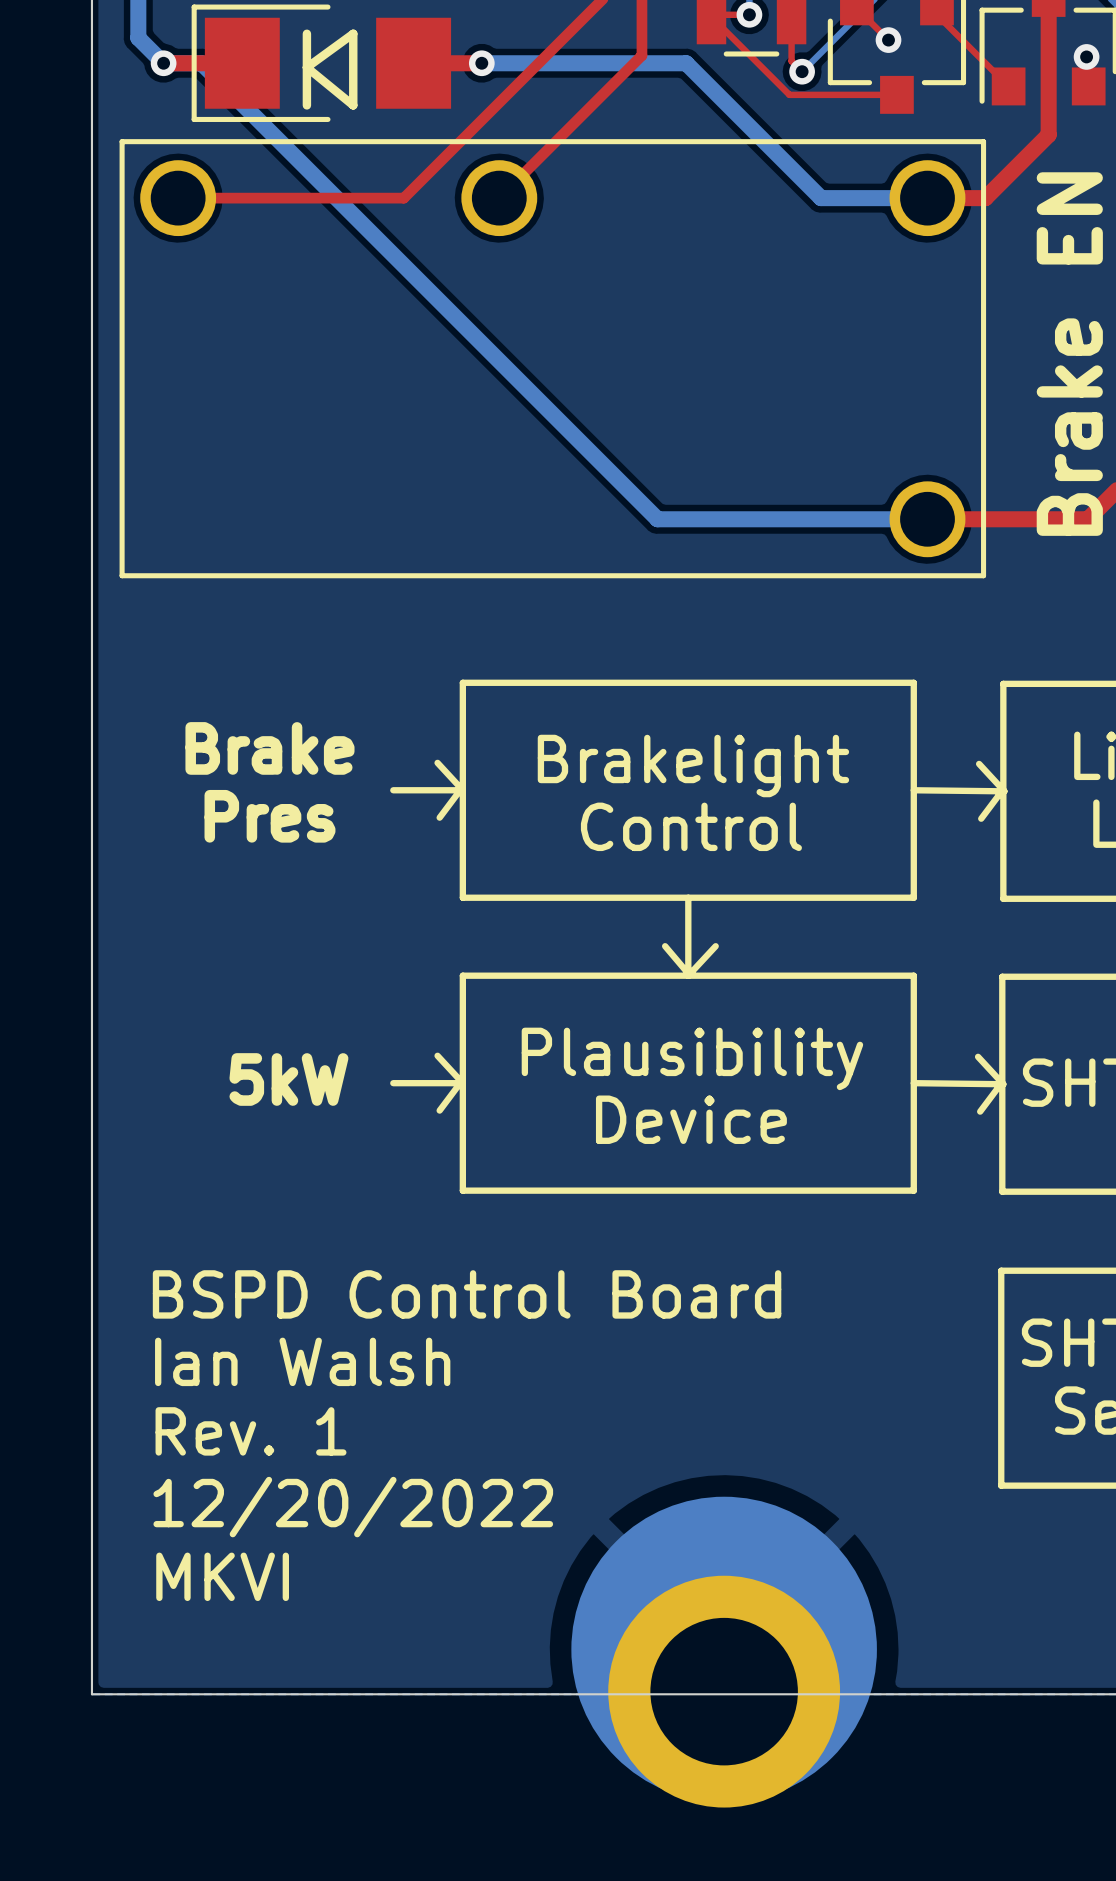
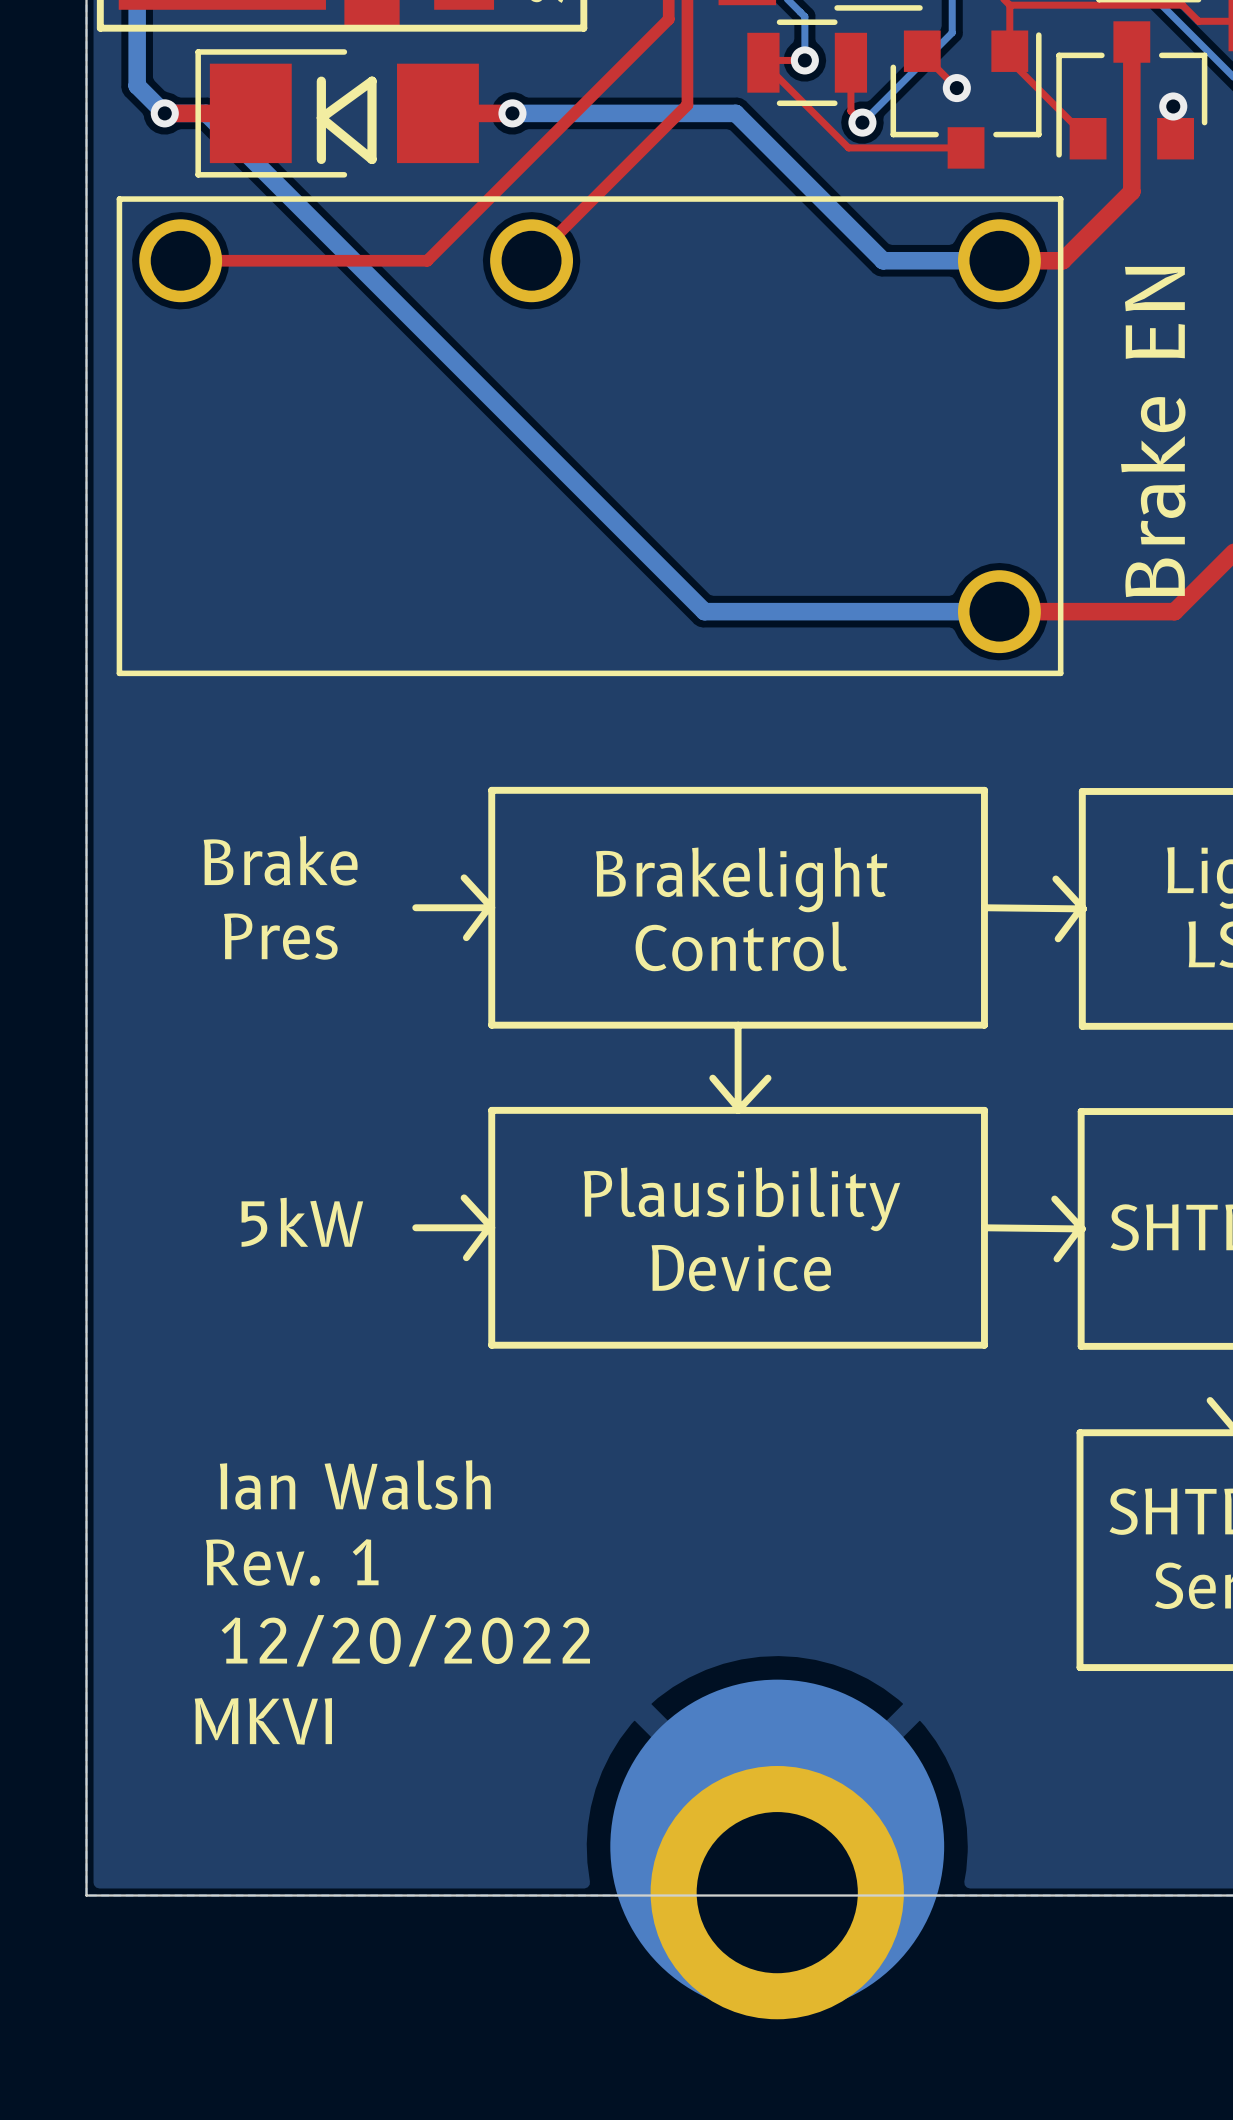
text: BSPD Control Board (467, 1294) -> none
text position: Ian Walsh (302, 1361) -> Ian Walsh (355, 1484)
text position: Rev. 1 (251, 1431) -> Rev. 1 (292, 1562)
text position: 12/20/2022 (353, 1507) -> 12/20/2022 (405, 1640)
text position: MKVI (222, 1576) -> MKVI (263, 1721)

